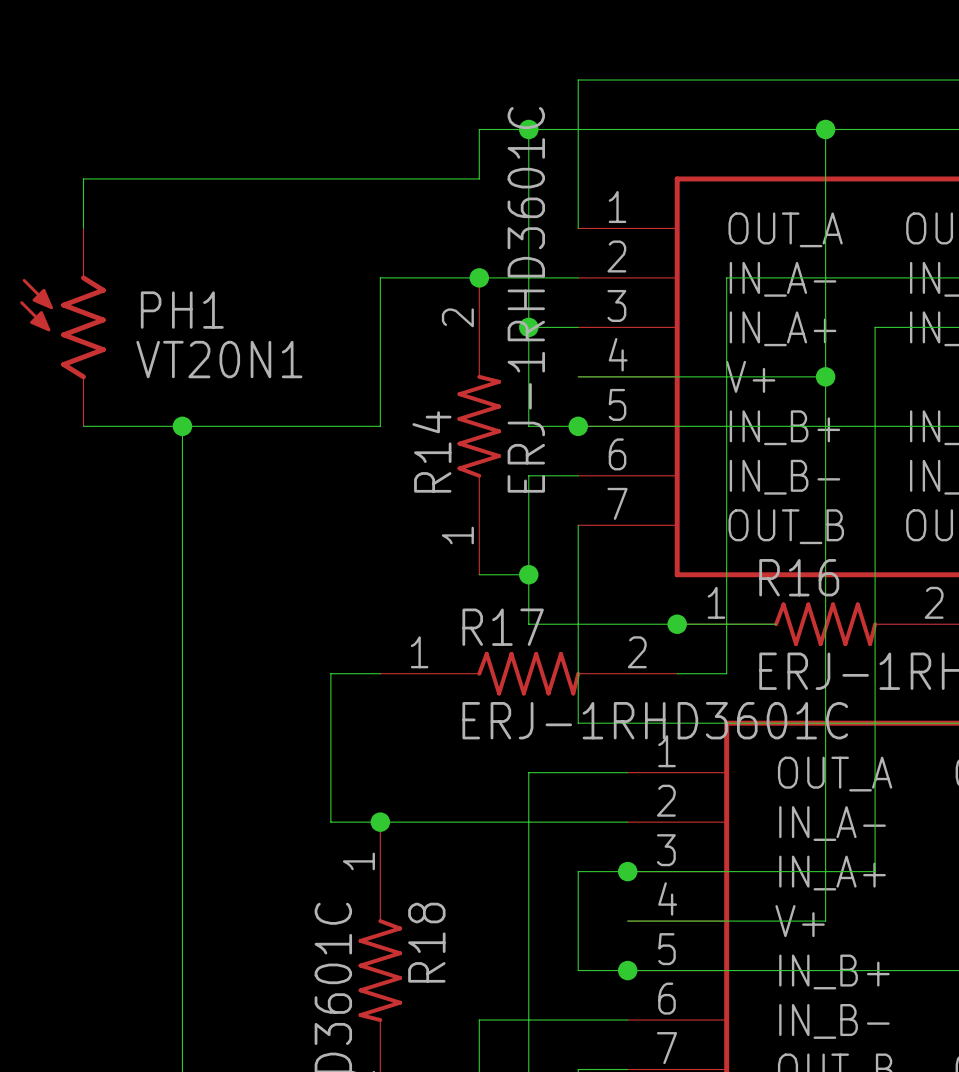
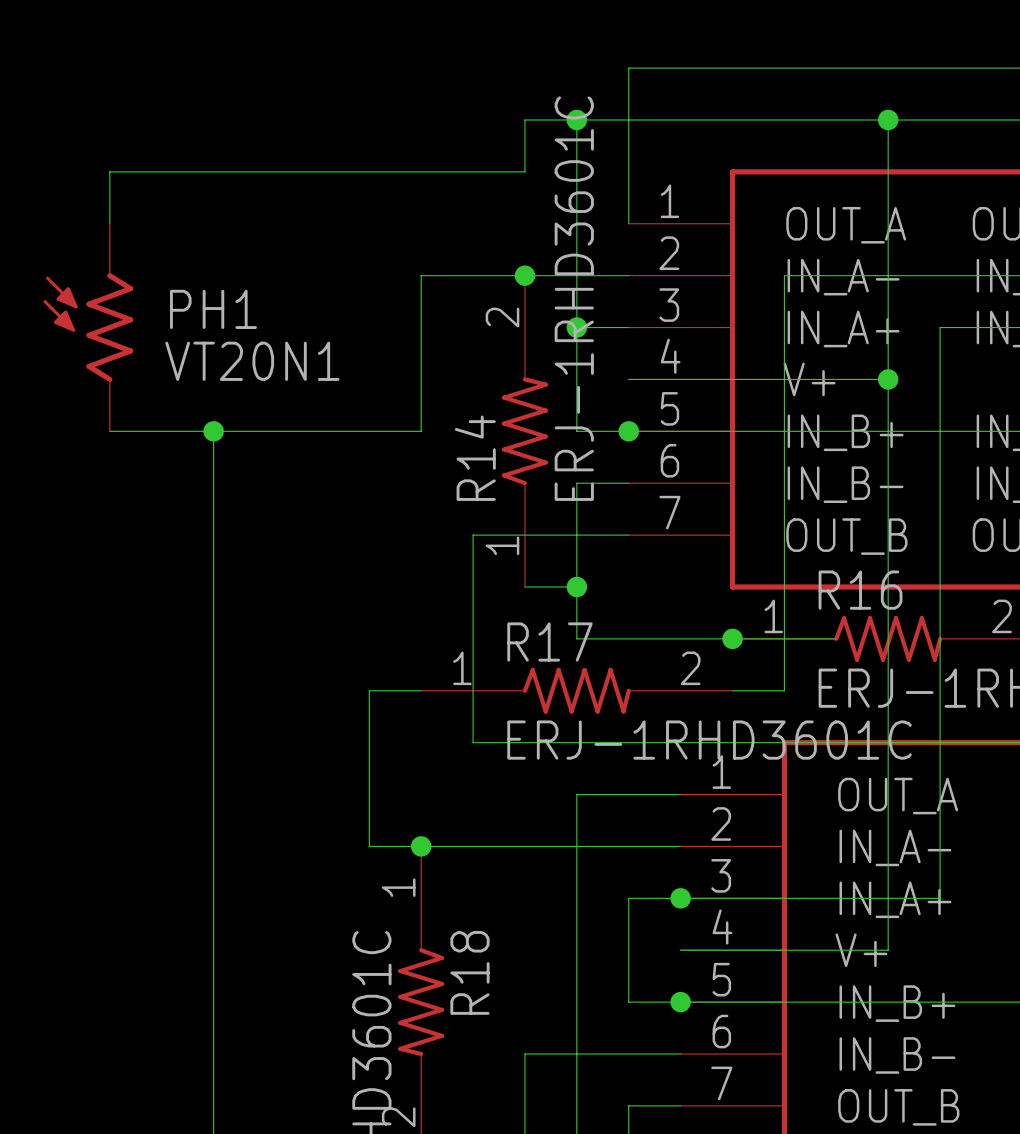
wire: (578, 525) (578, 723) -> (628, 535) (473, 535) (473, 742) (628, 742)

